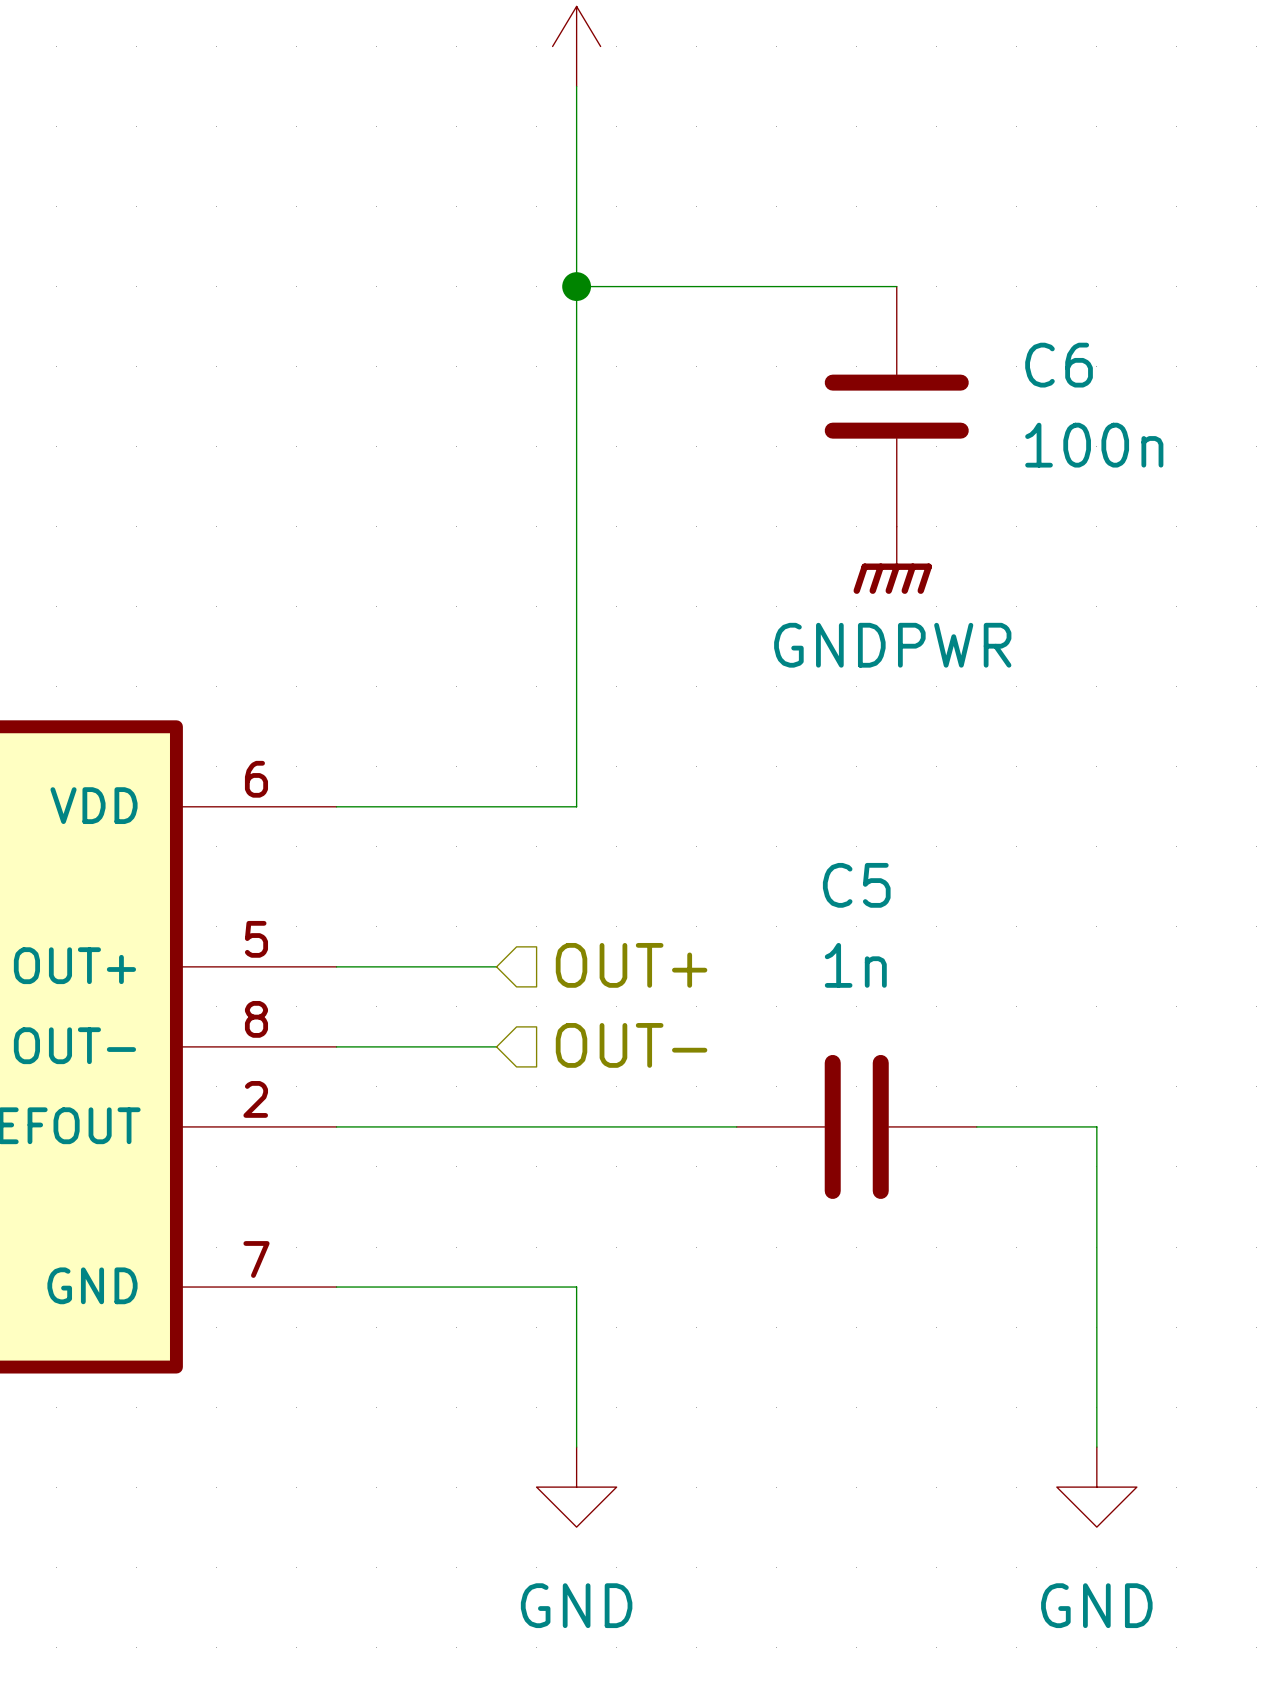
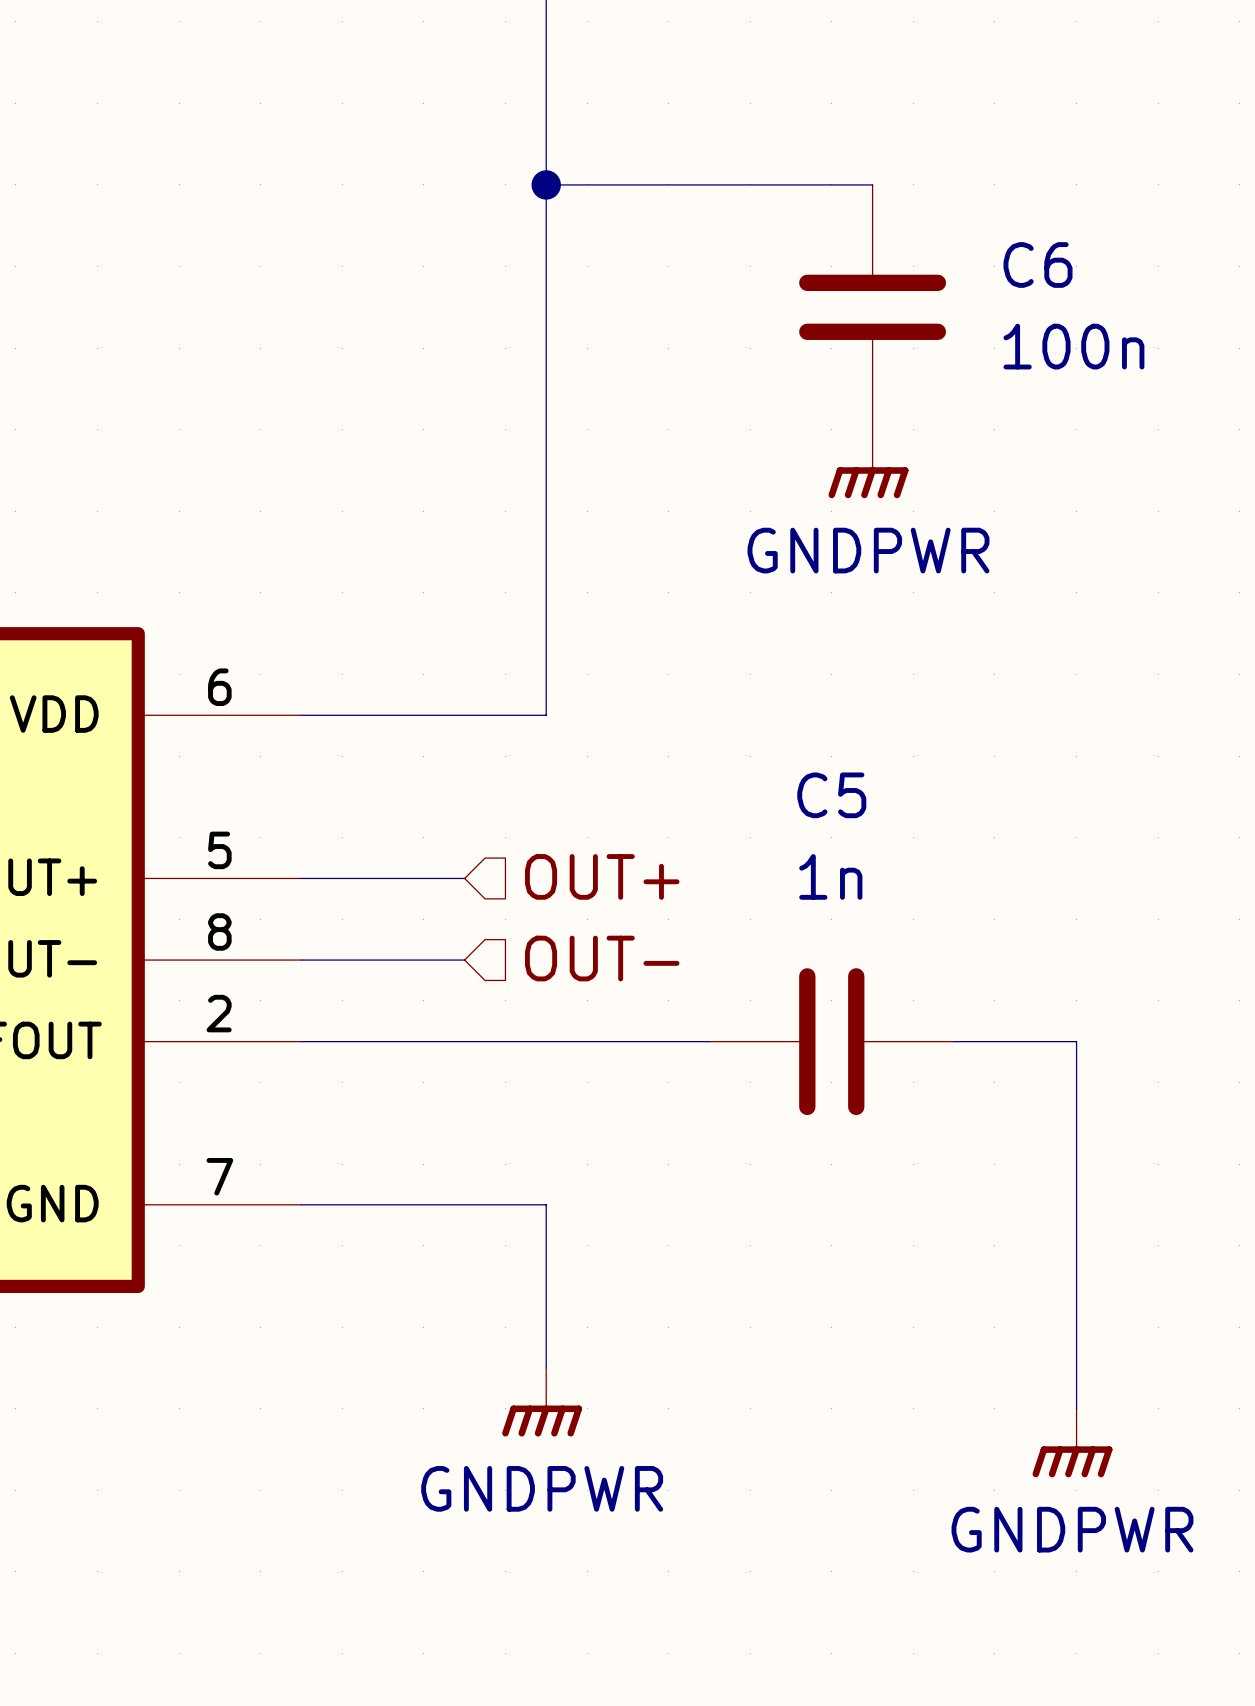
power symbol: GND (576, 1487) -> GNDPWR (542, 1402)
power symbol: GND (1096, 1487) -> none
power symbol: none -> GNDPWR (1072, 1443)

